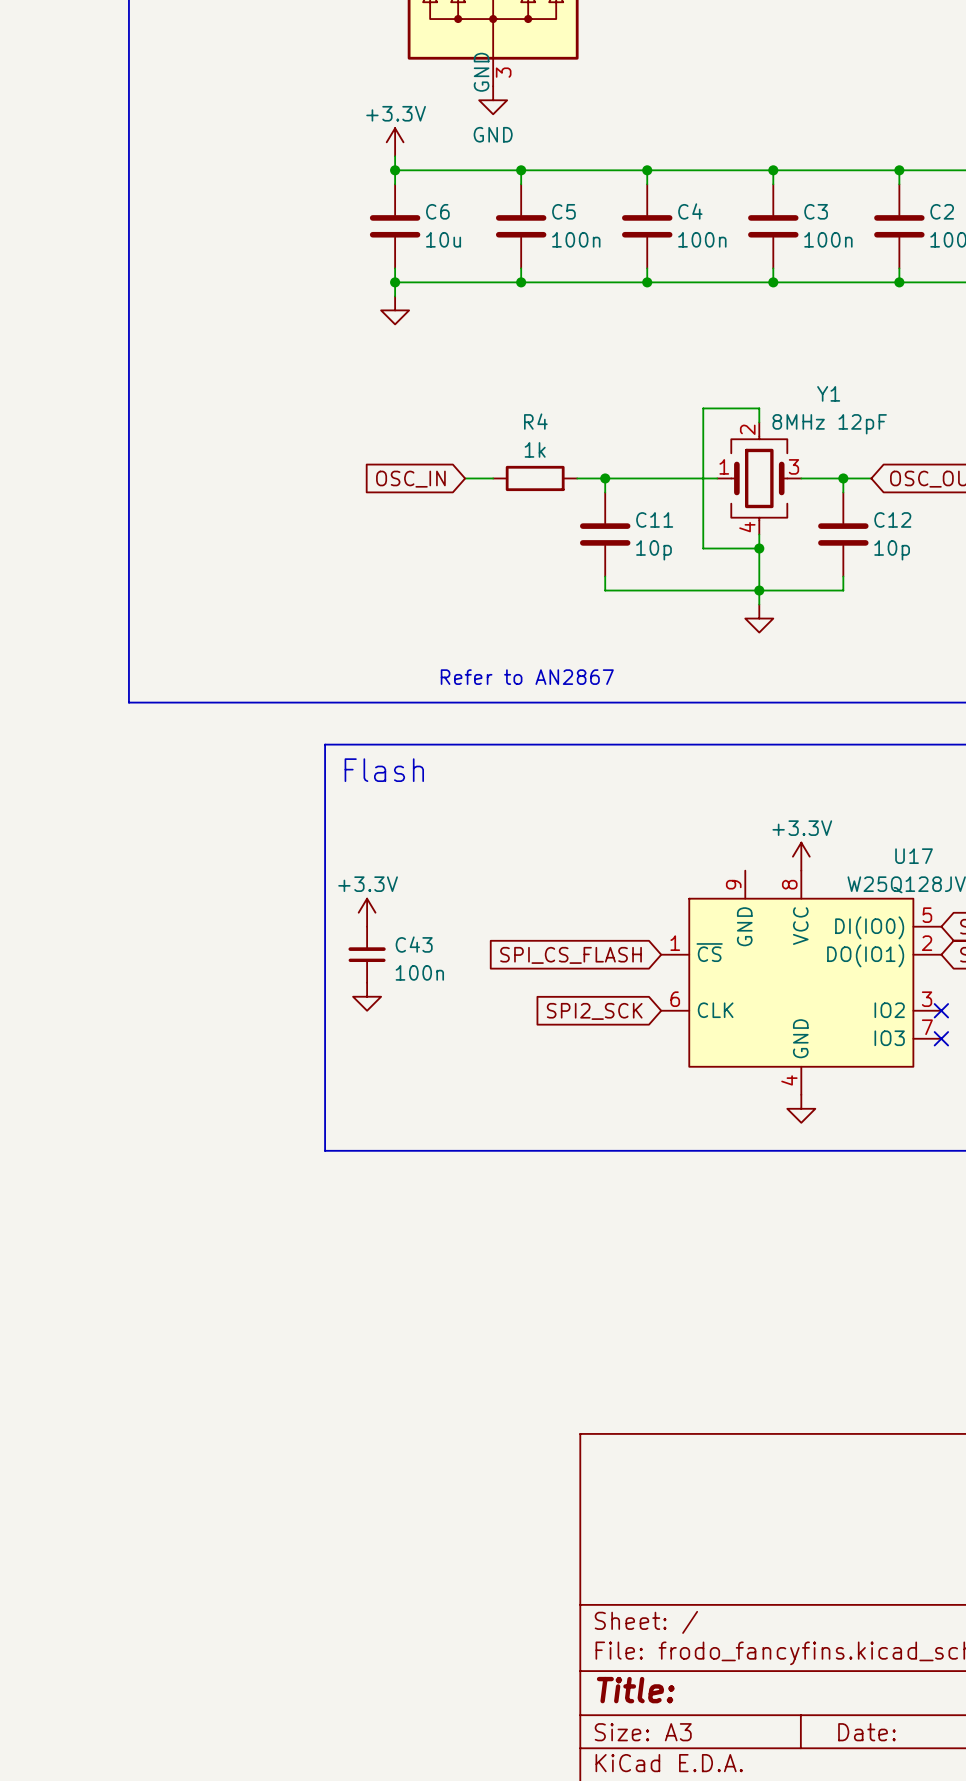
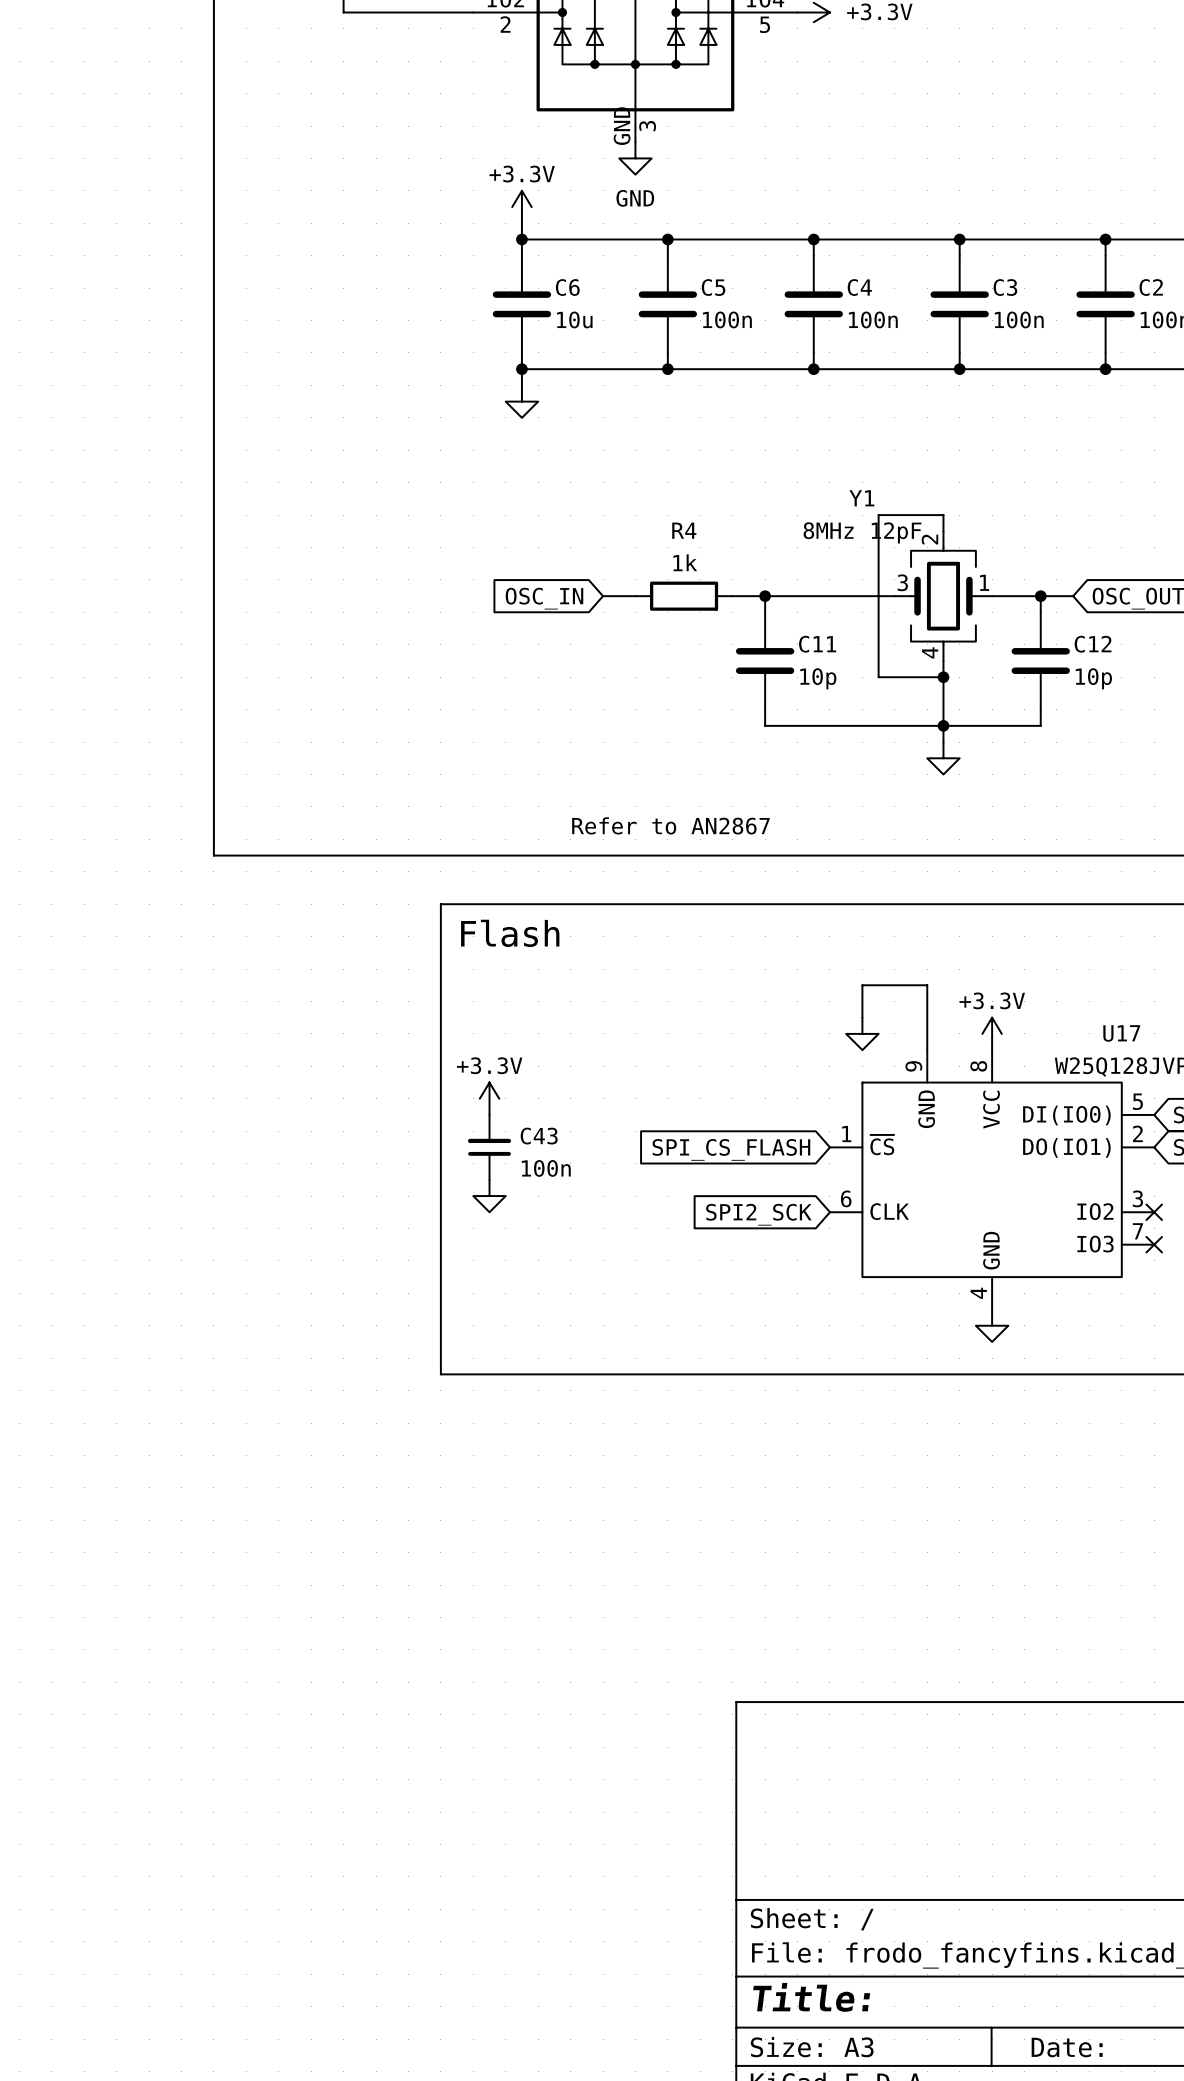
Y1 flip: as is (759, 478) -> left-right (943, 596)
wire: none -> (862, 1017) (862, 985) (927, 985) (927, 1050)
power symbol: none -> (862, 1033)

